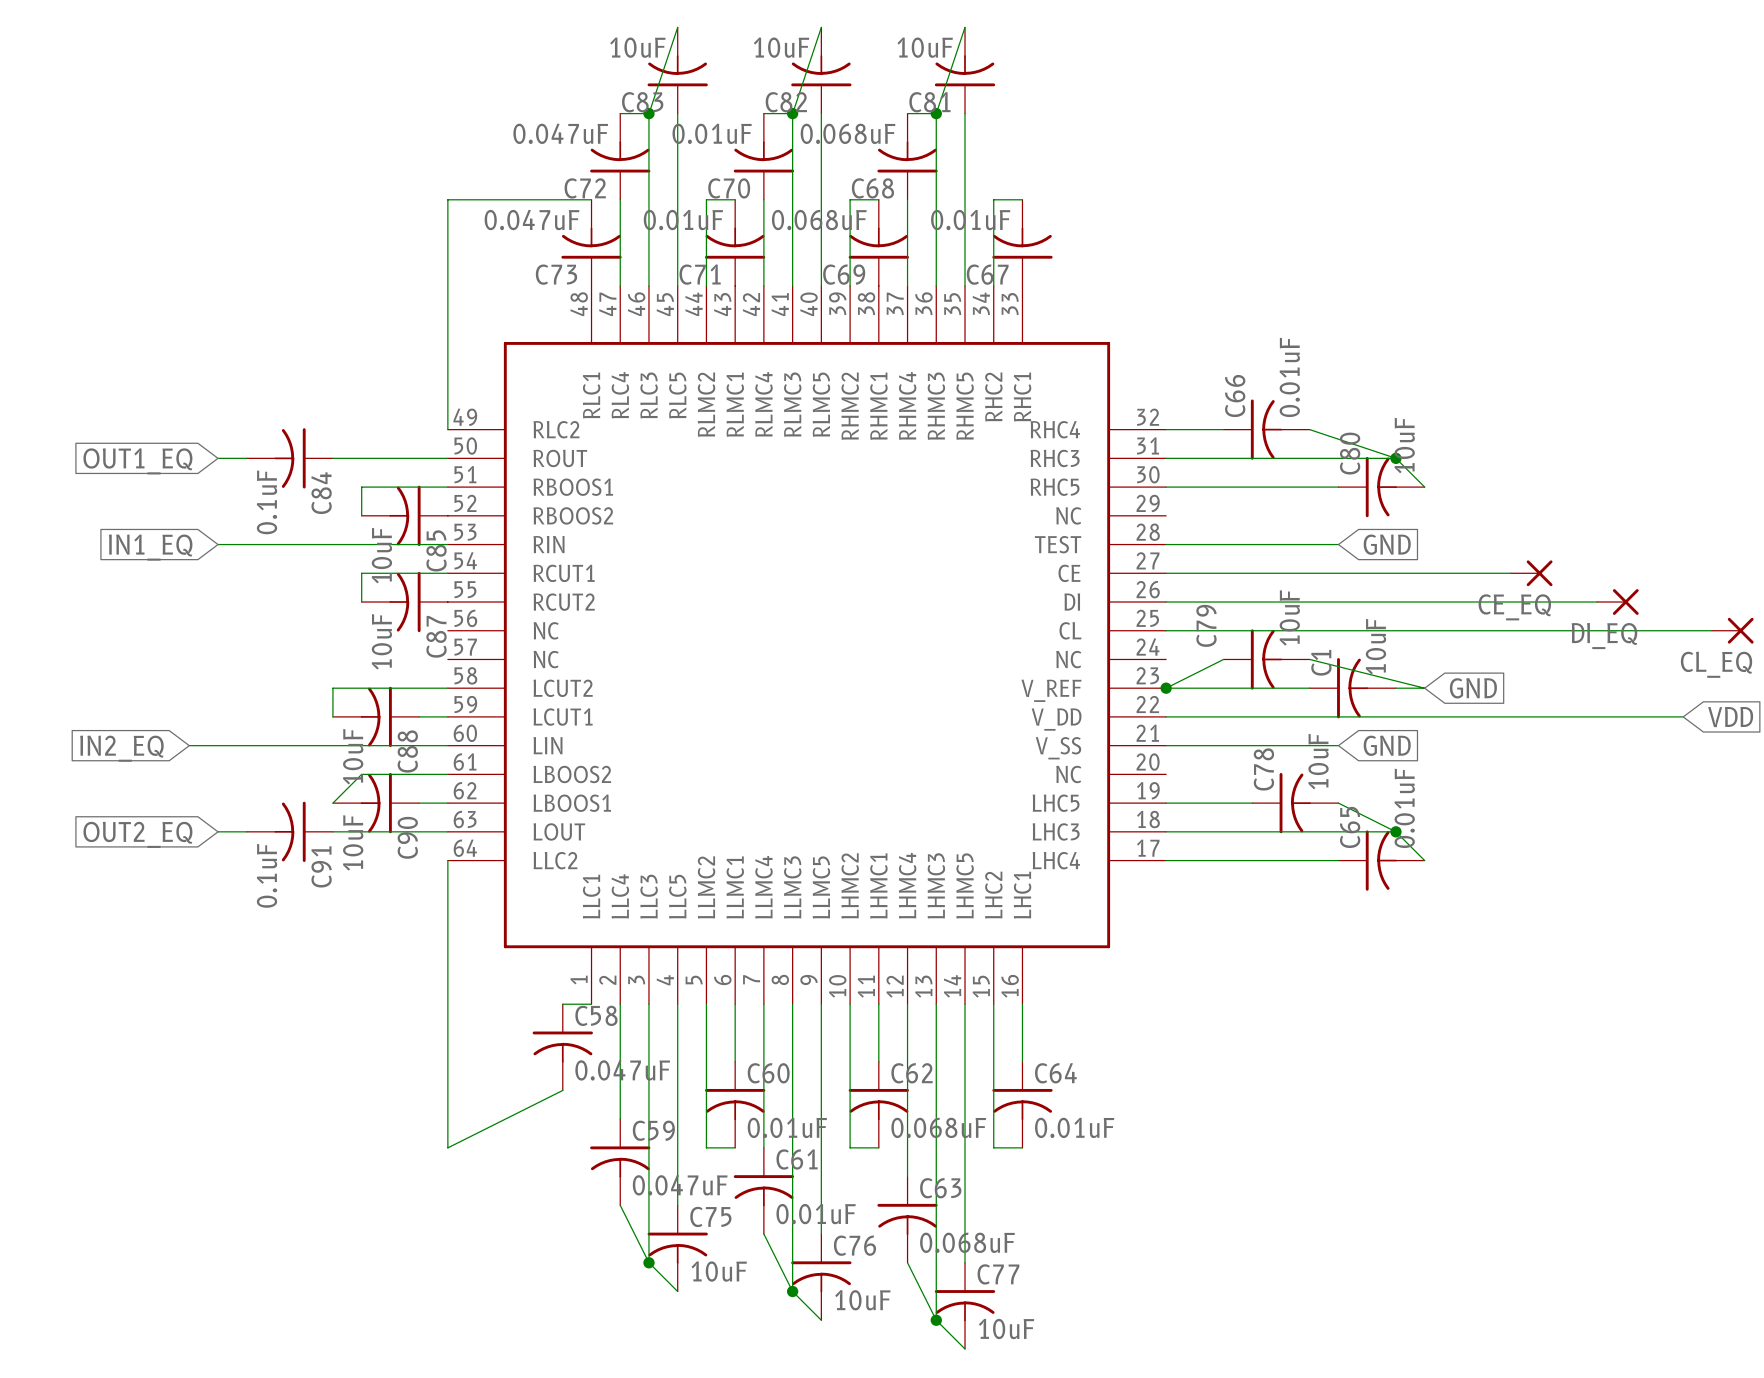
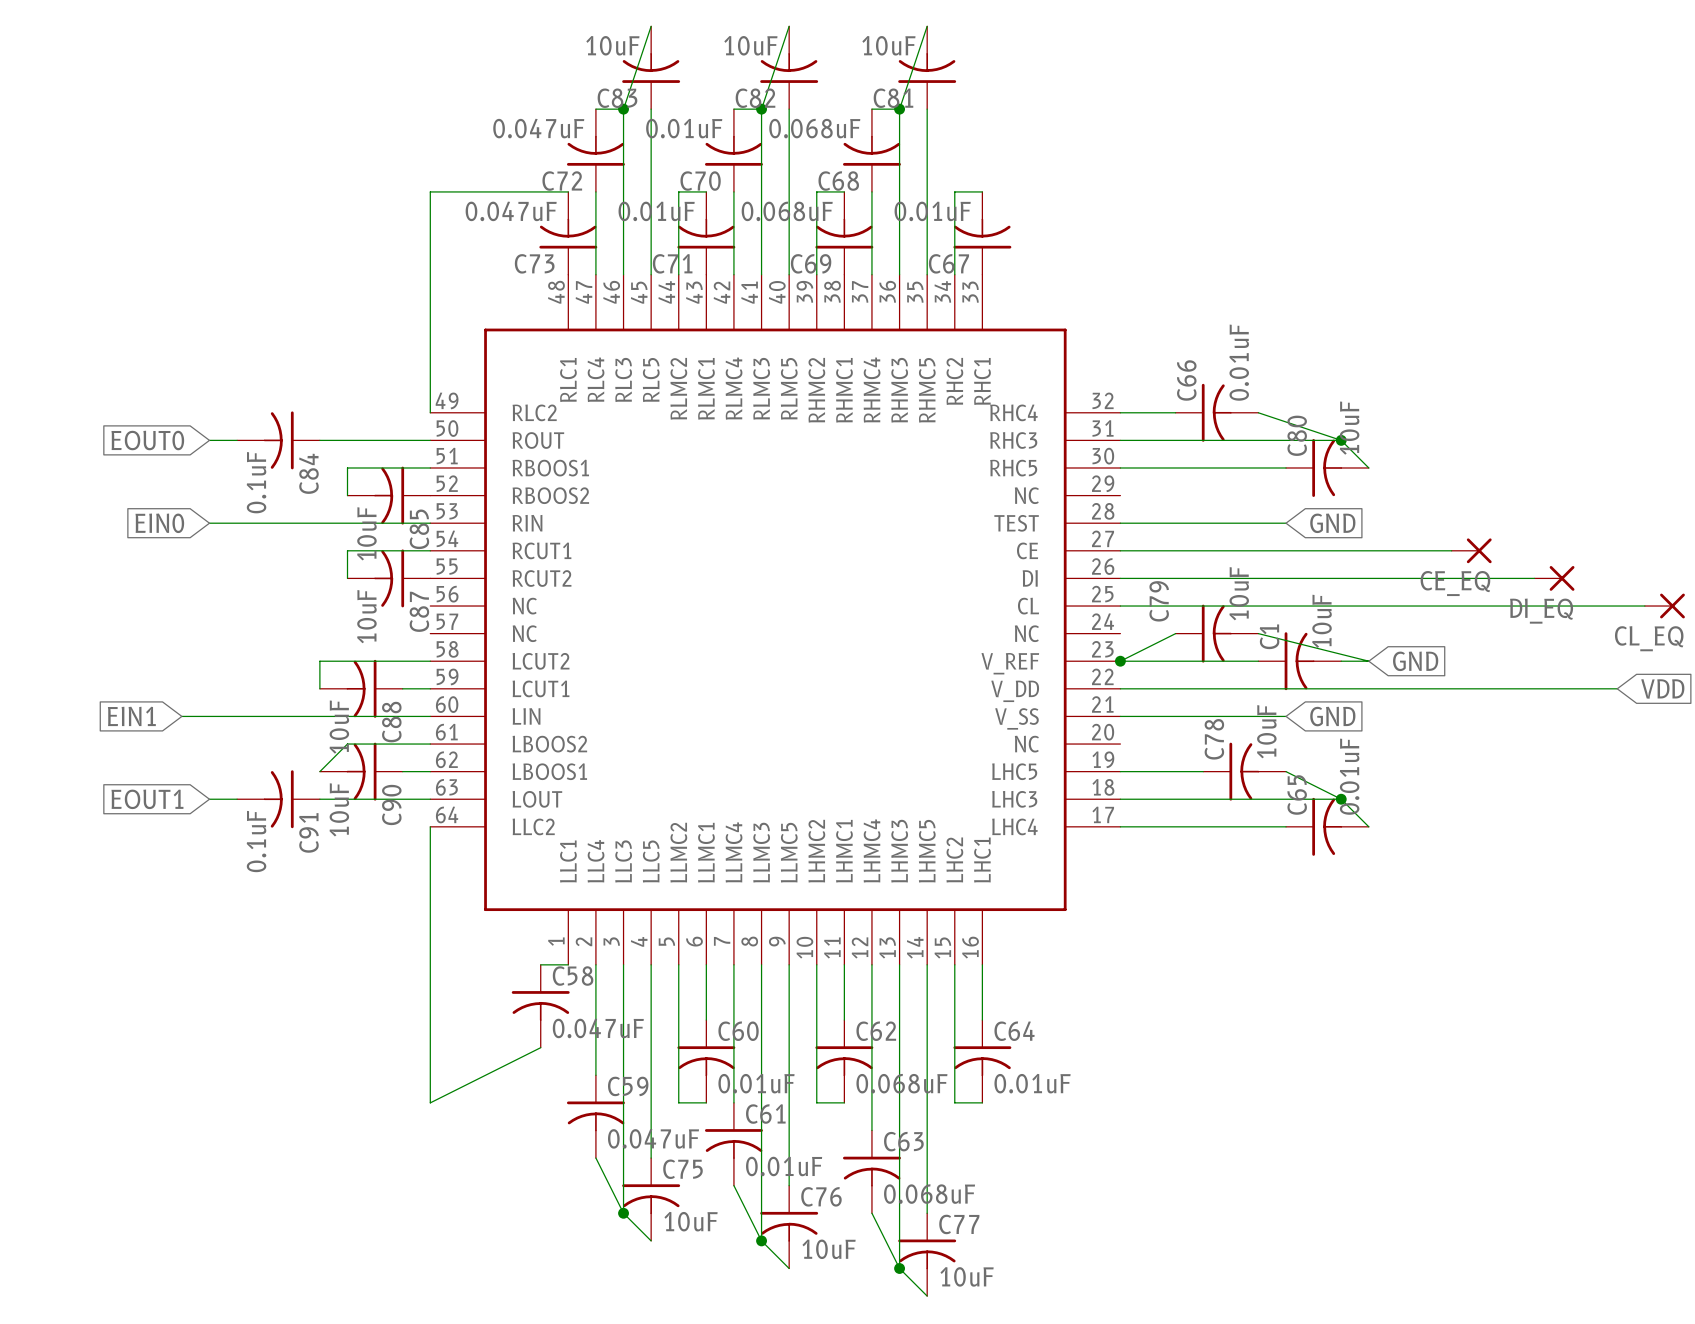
global label: OUT1_EQ (137, 461) -> EOUT0 (147, 440)
global label: IN1_EQ (150, 547) -> EIN0 (159, 523)
global label: IN2_EQ (121, 748) -> EIN1 (131, 716)
global label: OUT2_EQ (137, 834) -> EOUT1 (147, 799)

